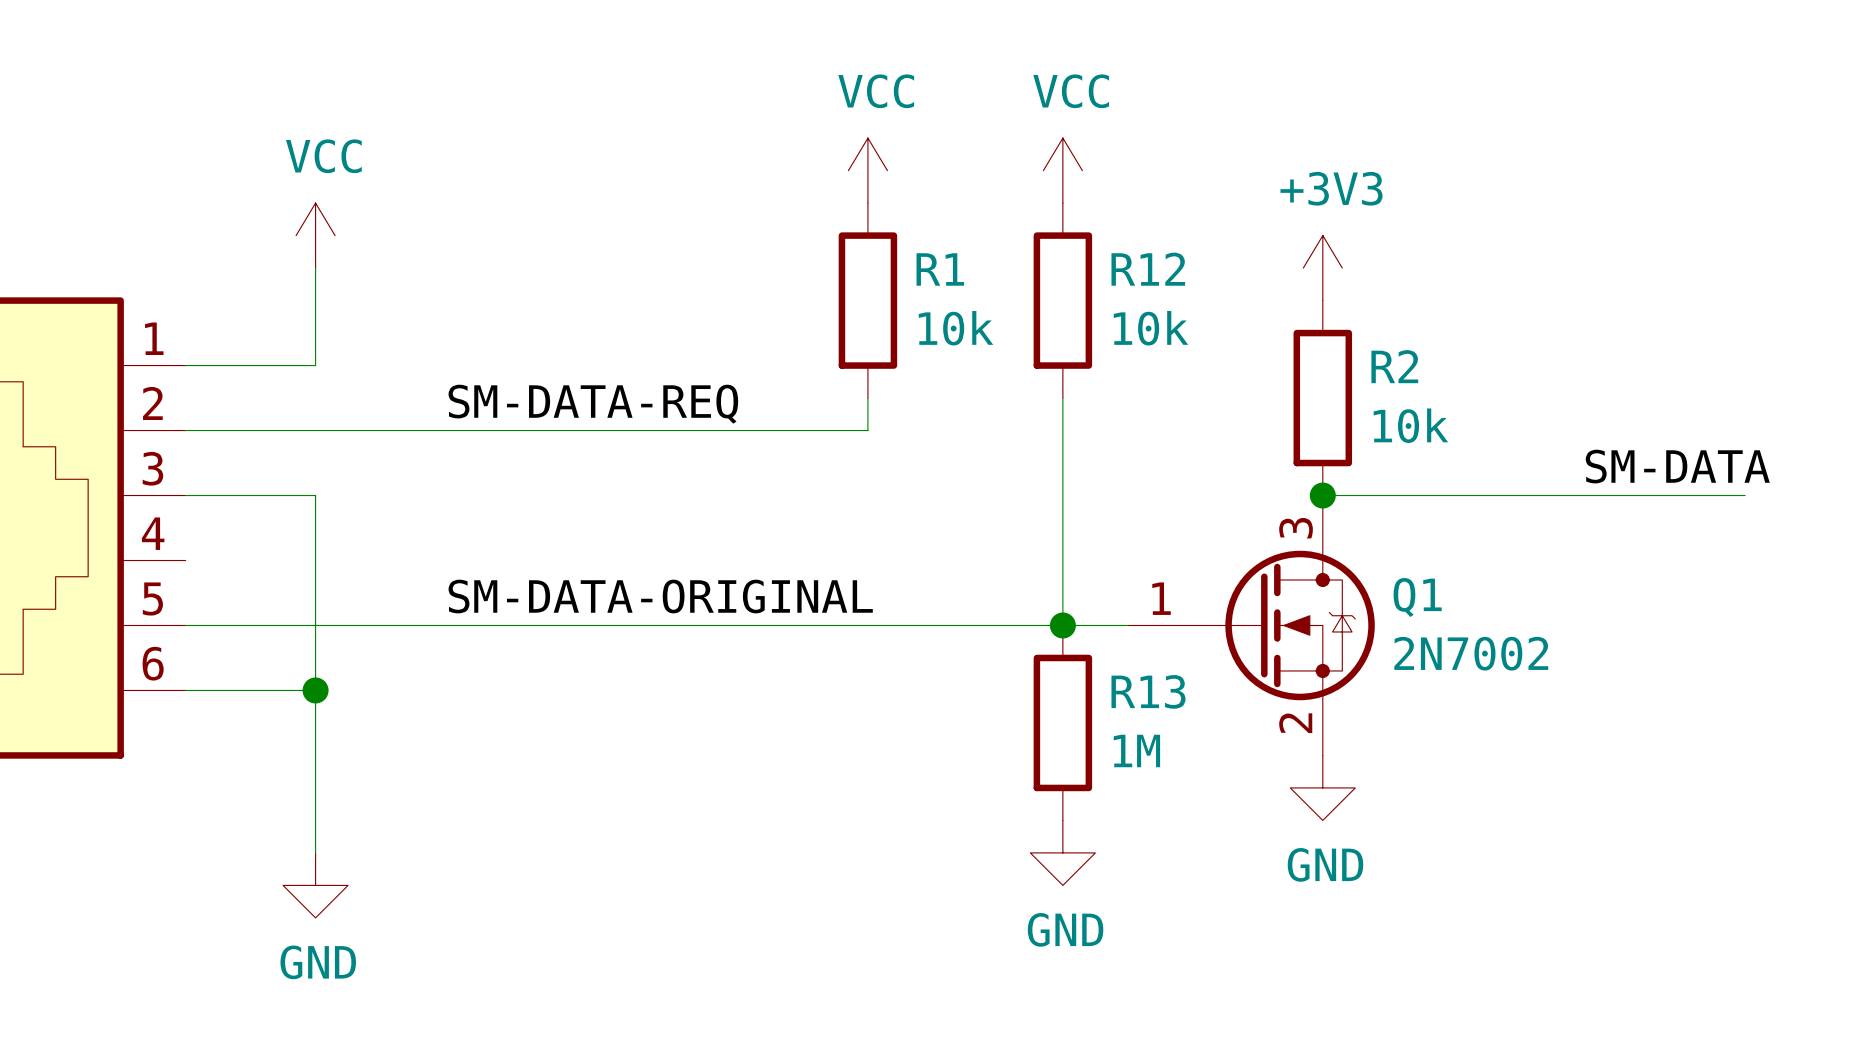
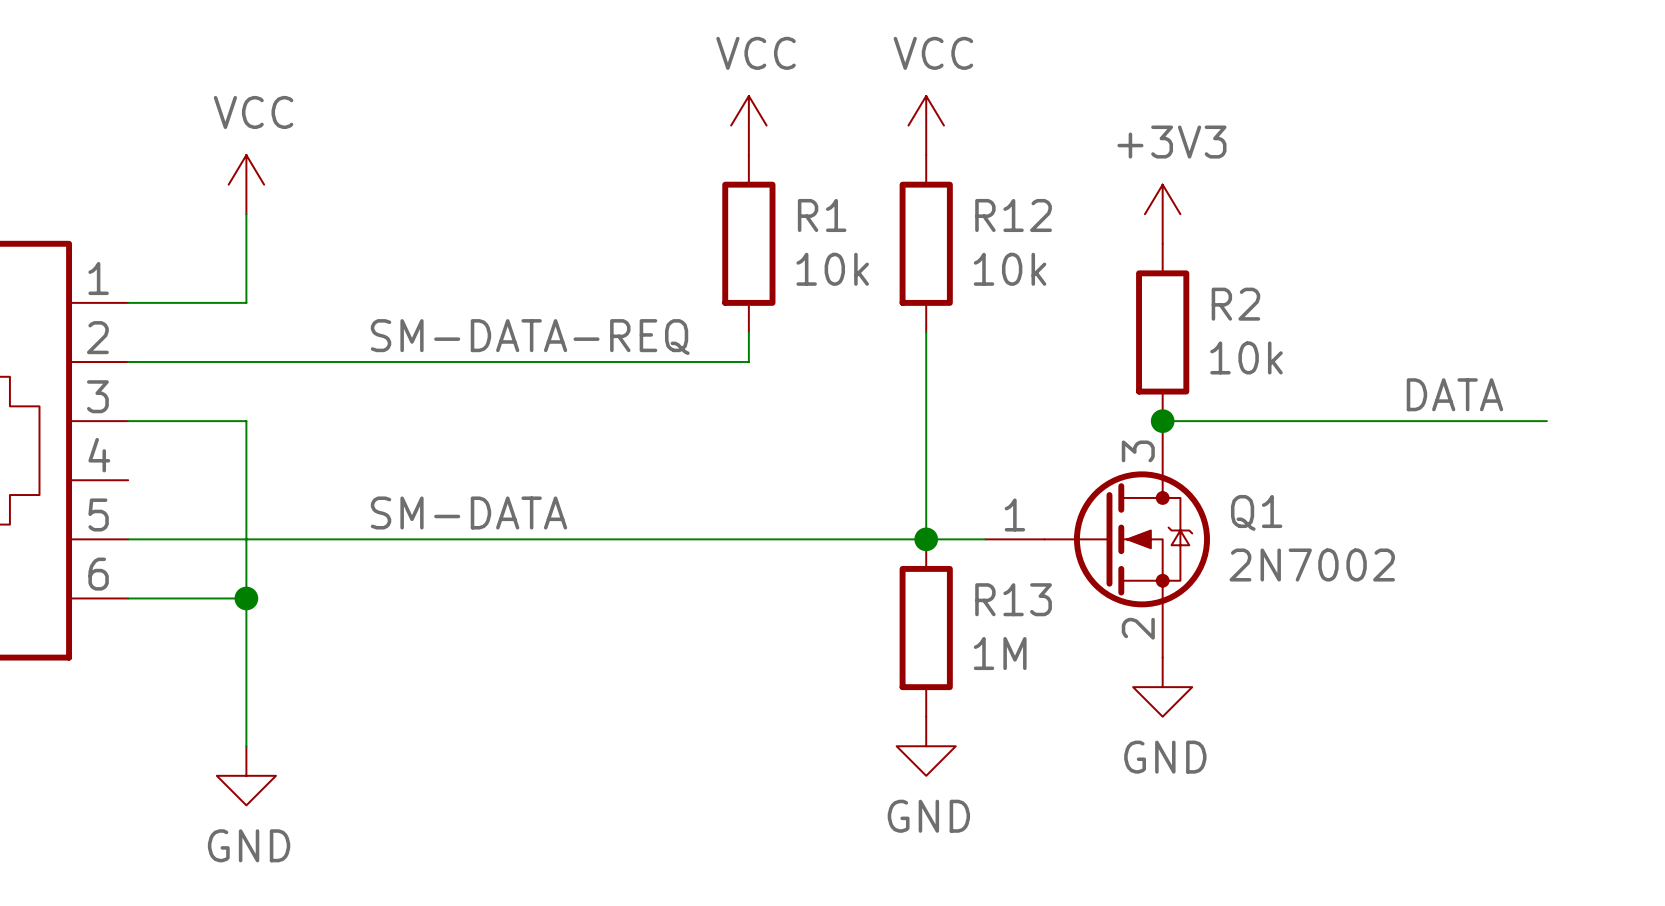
label: SM-DATA (1677, 466) -> DATA (1454, 394)
label: SM-DATA-ORIGINAL (660, 596) -> SM-DATA (469, 512)

